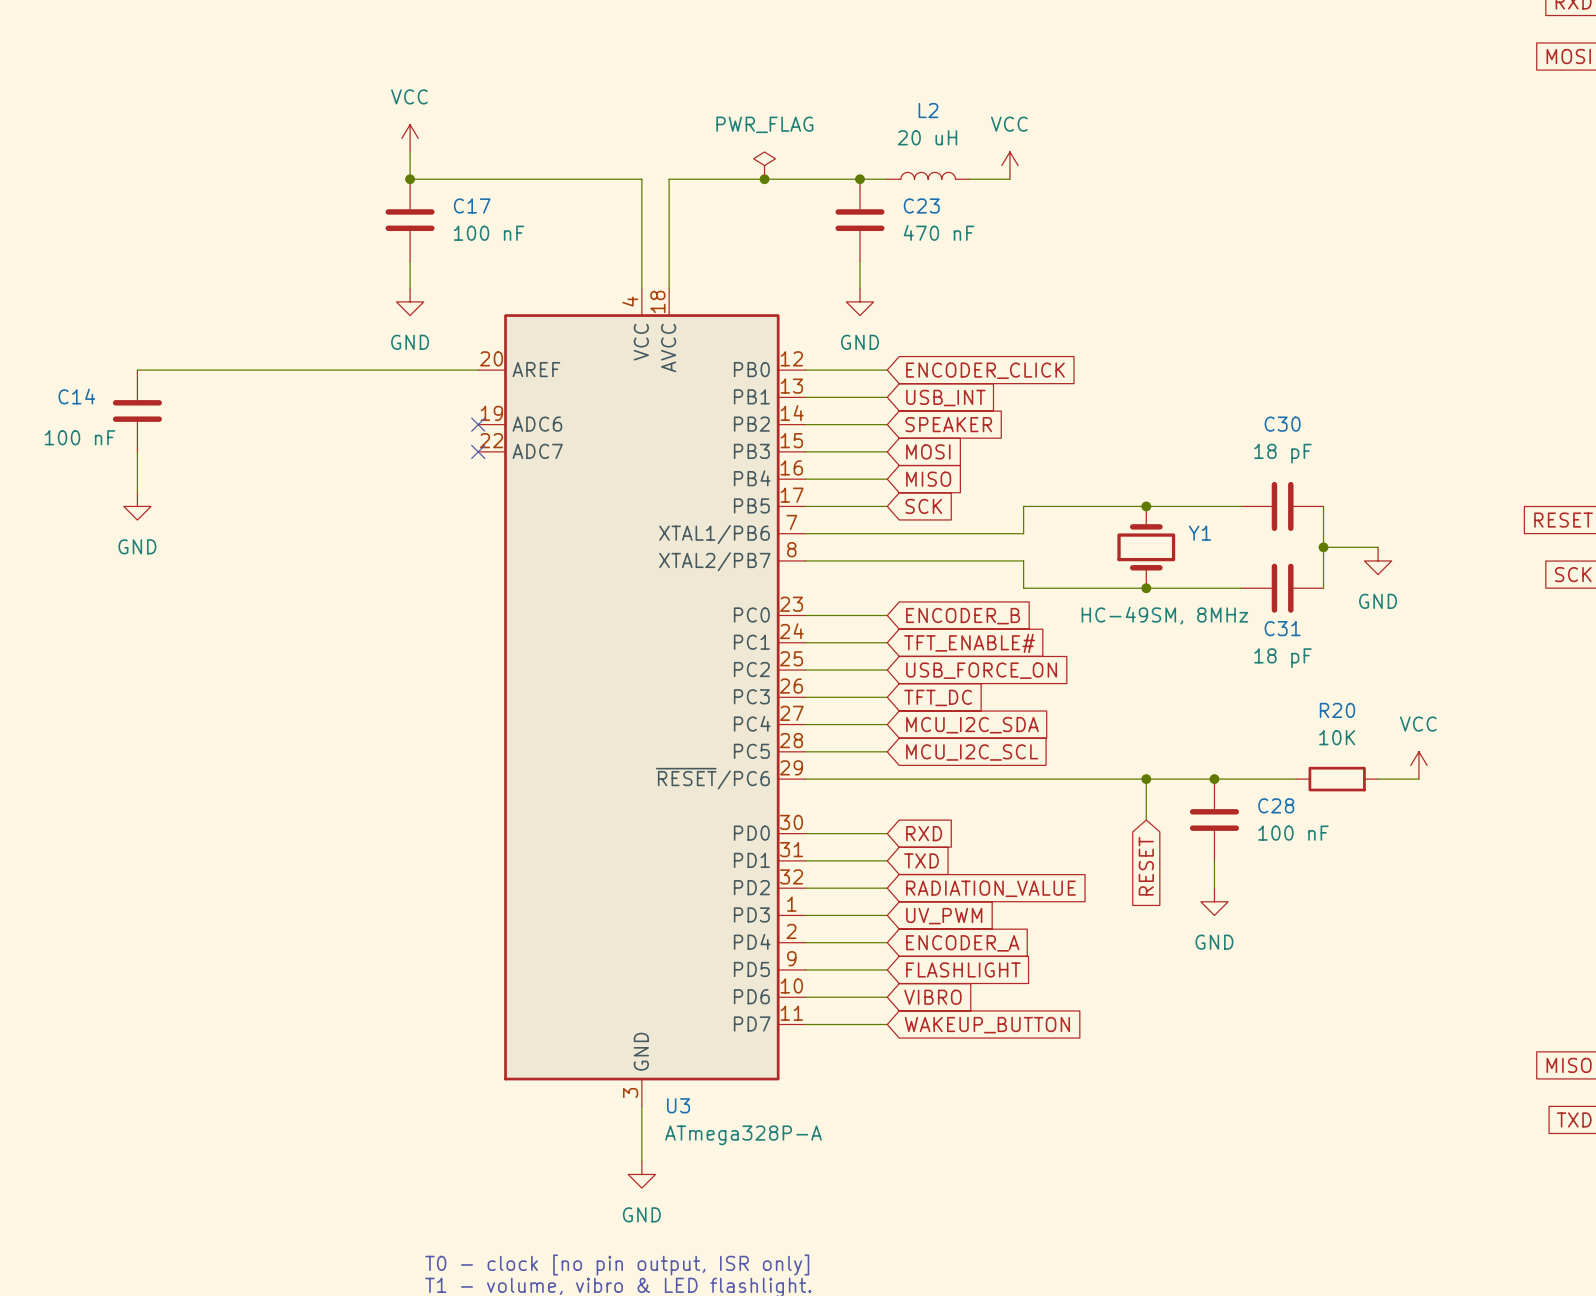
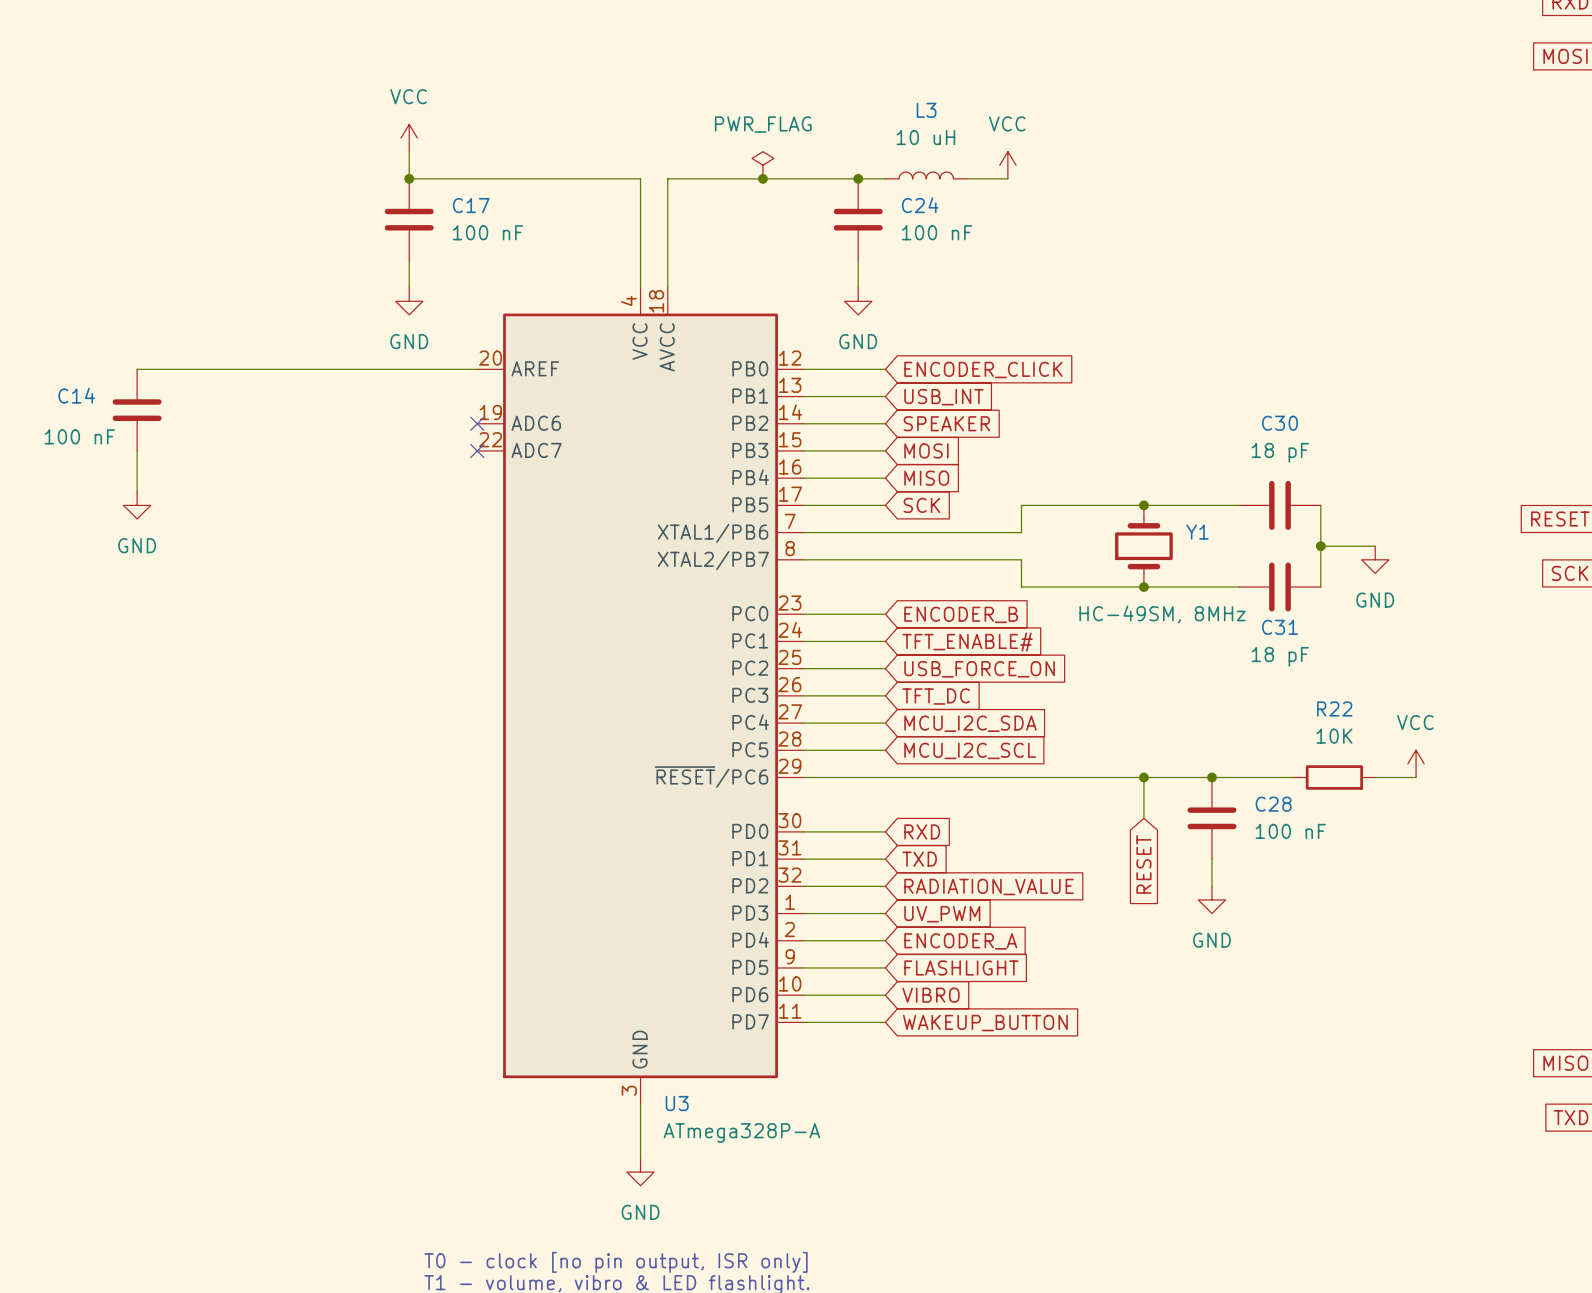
L2 name: L2 (928, 110) -> L3 (926, 110)
L2 value: 20 uH (927, 137) -> 10 uH (925, 137)
C23 name: C23 (921, 205) -> C24 (920, 205)
C23 value: 470 nF (938, 232) -> 100 nF (937, 232)
R20 name: R20 (1337, 710) -> R22 (1334, 708)

